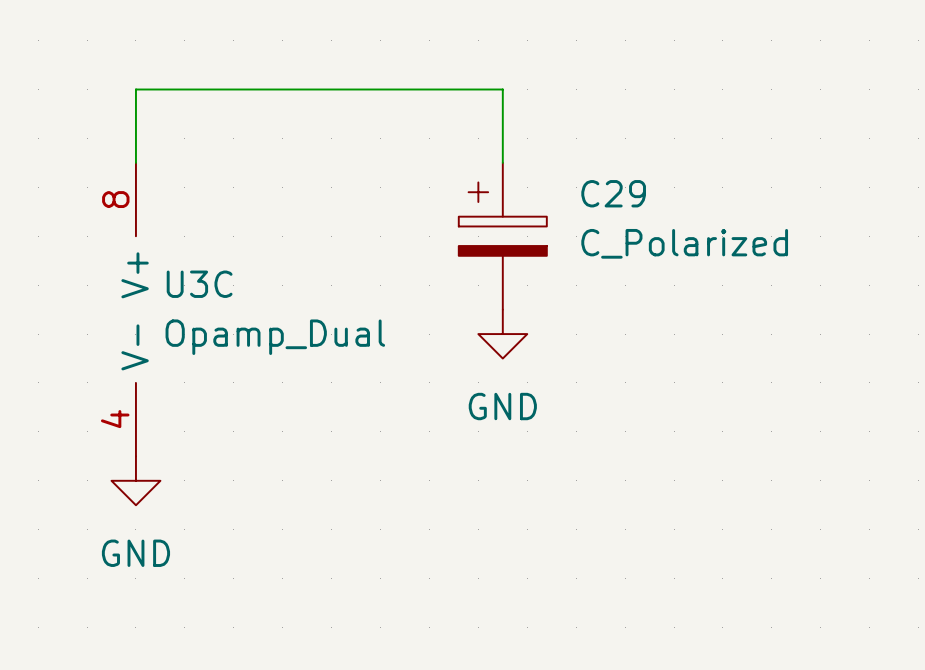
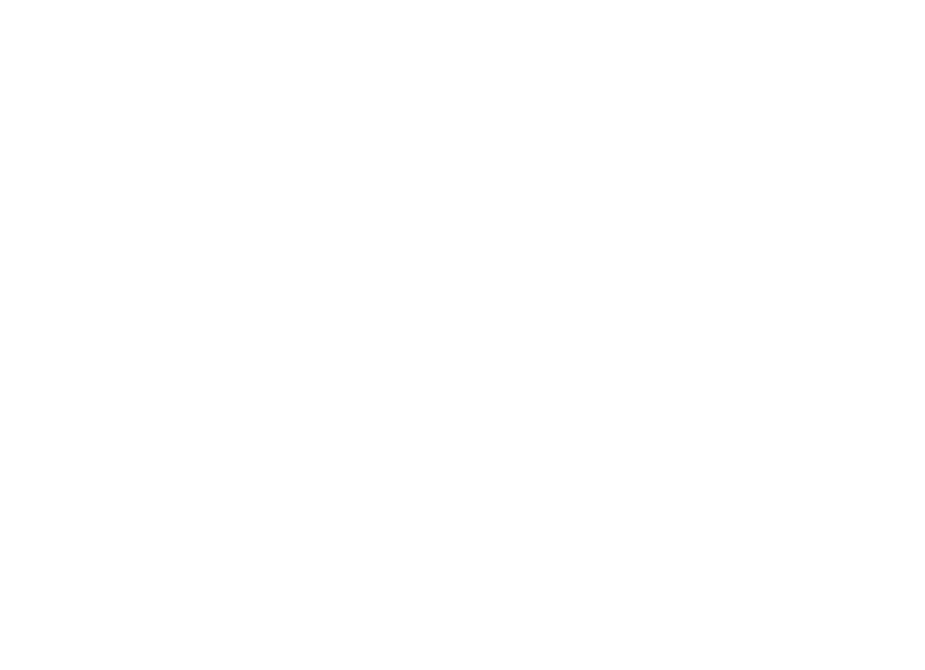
wire: (135, 162) (135, 89) (502, 89) (502, 162) -> none
C29: C_Polarized (502, 236) -> none
U3C: Opamp_Dual (135, 309) -> none
power symbol: GND (502, 334) -> none
power symbol: GND (135, 480) -> none

